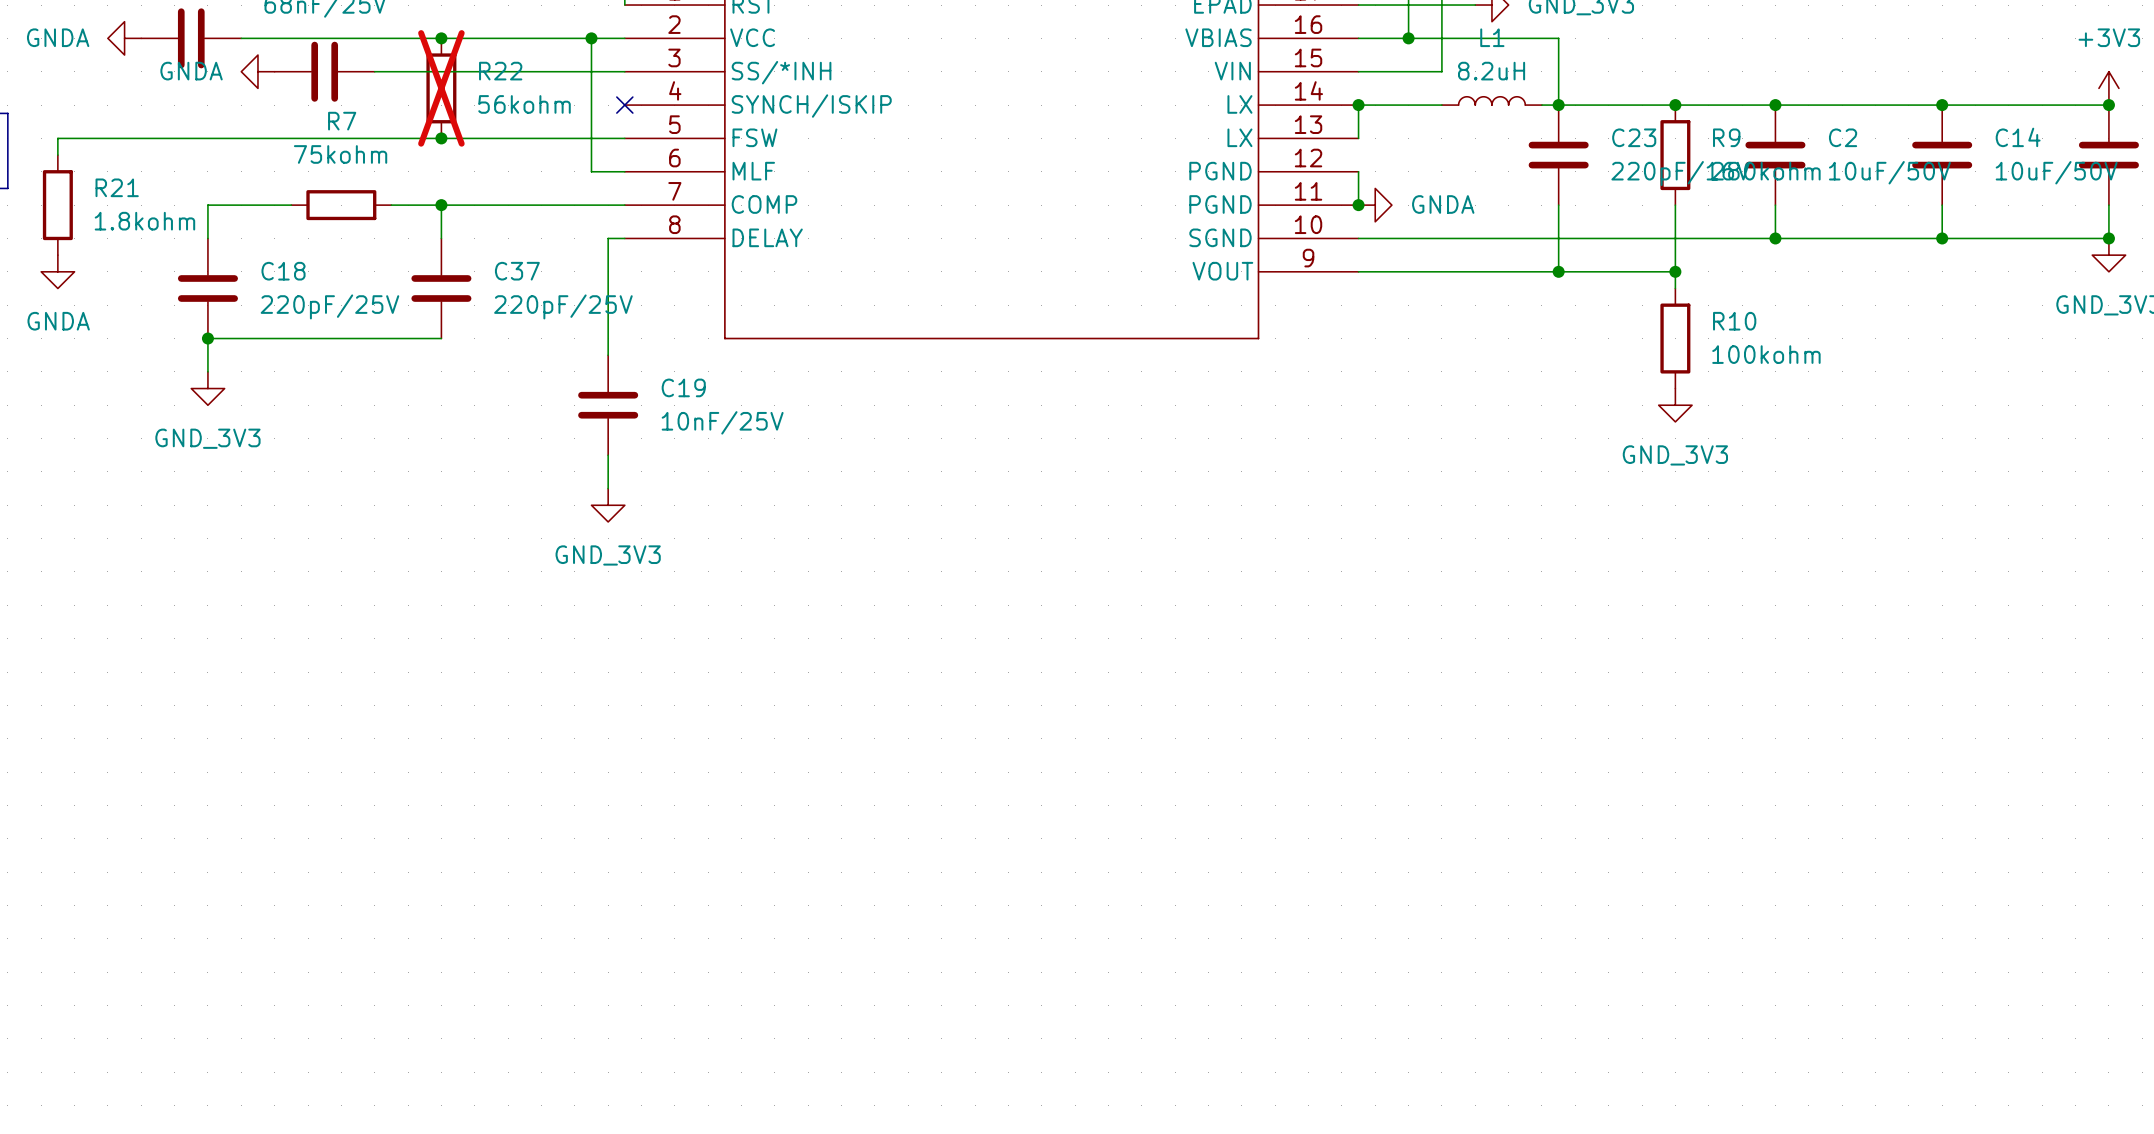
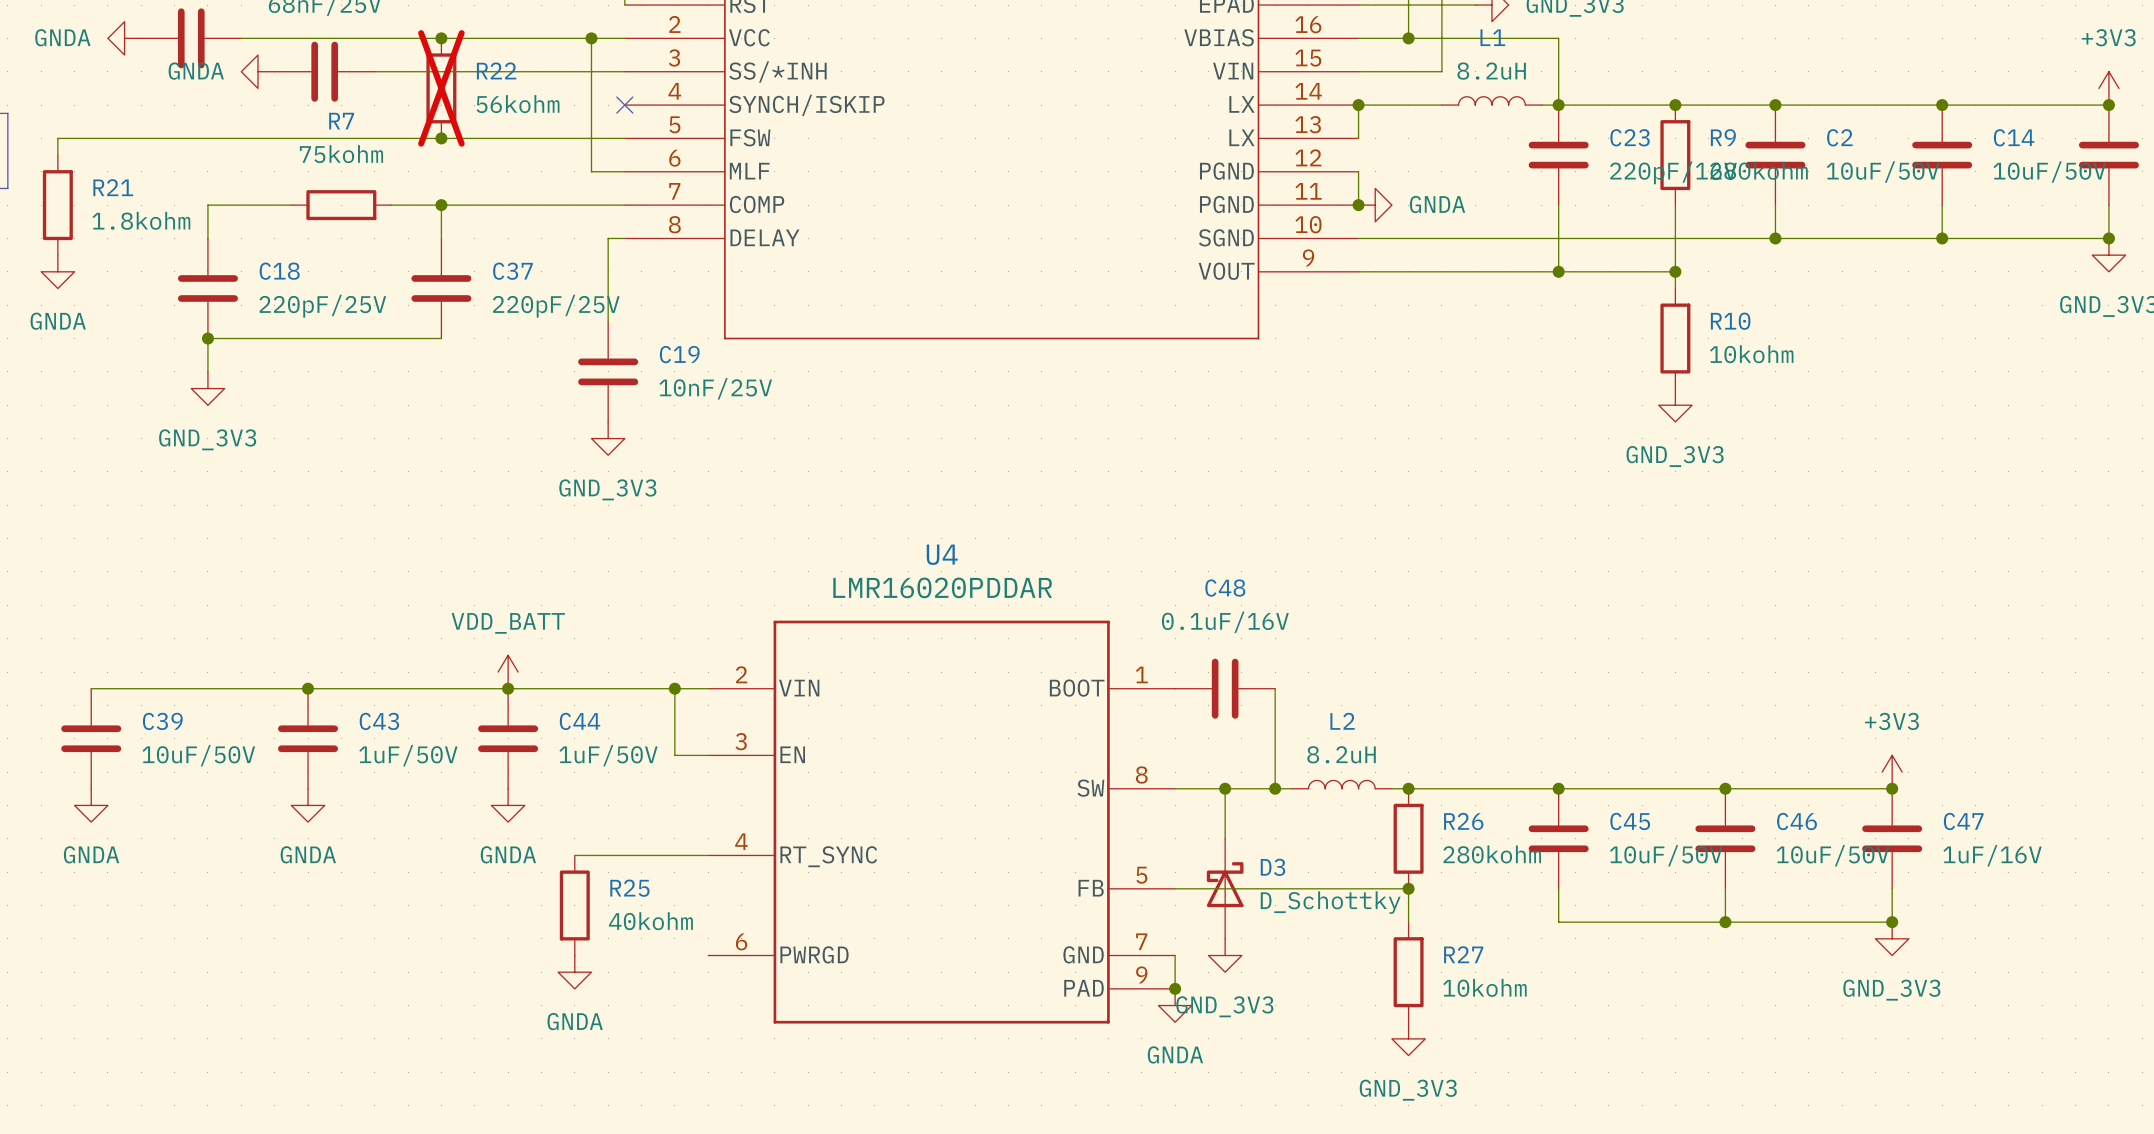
R10 value: 100kohm (1766, 354) -> 10kohm (1751, 354)
C19 position: (608, 405) -> (608, 371)
wire: (608, 455) (608, 488) -> none
power symbol position: GND_3V3 (608, 505) -> GND_3V3 (608, 438)
power symbol: none -> VDD_BATT (508, 672)
wire: none -> (91, 688) (708, 688)
junction: none -> (308, 688)
junction: none -> (508, 688)
wire: none -> (674, 688) (674, 755) (708, 755)
junction: none -> (674, 688)
C48: none -> 0.1uF/16V (1225, 688)
wire: none -> (1275, 688) (1275, 788)
C39: none -> 10uF/50V (91, 738)
C43: none -> 1uF/50V (308, 738)
C44: none -> 1uF/50V (508, 738)
power symbol: none -> +3V3 (1892, 772)
L2: none -> 8.2uH (1341, 784)
wire: none -> (1175, 788) (1291, 788)
wire: none -> (1225, 788) (1225, 838)
junction: none -> (1225, 788)
junction: none -> (1275, 788)
wire: none -> (1391, 788) (1892, 788)
junction: none -> (1408, 788)
junction: none -> (1558, 788)
junction: none -> (1725, 788)
junction: none -> (1892, 788)
power symbol: none -> GNDA (91, 805)
power symbol: none -> GNDA (308, 805)
power symbol: none -> GNDA (508, 805)
U4: none -> LMR16020PDDAR (941, 822)
R26: none -> 280kohm (1408, 838)
C45: none -> 10uF/50V (1558, 838)
C46: none -> 10uF/50V (1725, 838)
C47: none -> 1uF/16V (1892, 838)
wire: none -> (574, 855) (708, 855)
wire: none -> (1175, 888) (1408, 888) (1408, 922)
D3: none -> D_Schottky (1225, 888)
junction: none -> (1408, 888)
wire: none -> (1558, 888) (1558, 922) (1892, 922) (1892, 888)
wire: none -> (1725, 888) (1725, 922)
R25: none -> 40kohm (574, 905)
junction: none -> (1725, 922)
junction: none -> (1892, 922)
power symbol: none -> GND_3V3 (1892, 938)
wire: none -> (1175, 955) (1175, 988)
power symbol: none -> GND_3V3 (1225, 955)
power symbol: none -> GNDA (574, 972)
R27: none -> 10kohm (1408, 972)
junction: none -> (1175, 988)
power symbol: none -> GNDA (1175, 1005)
power symbol: none -> GND_3V3 (1408, 1038)

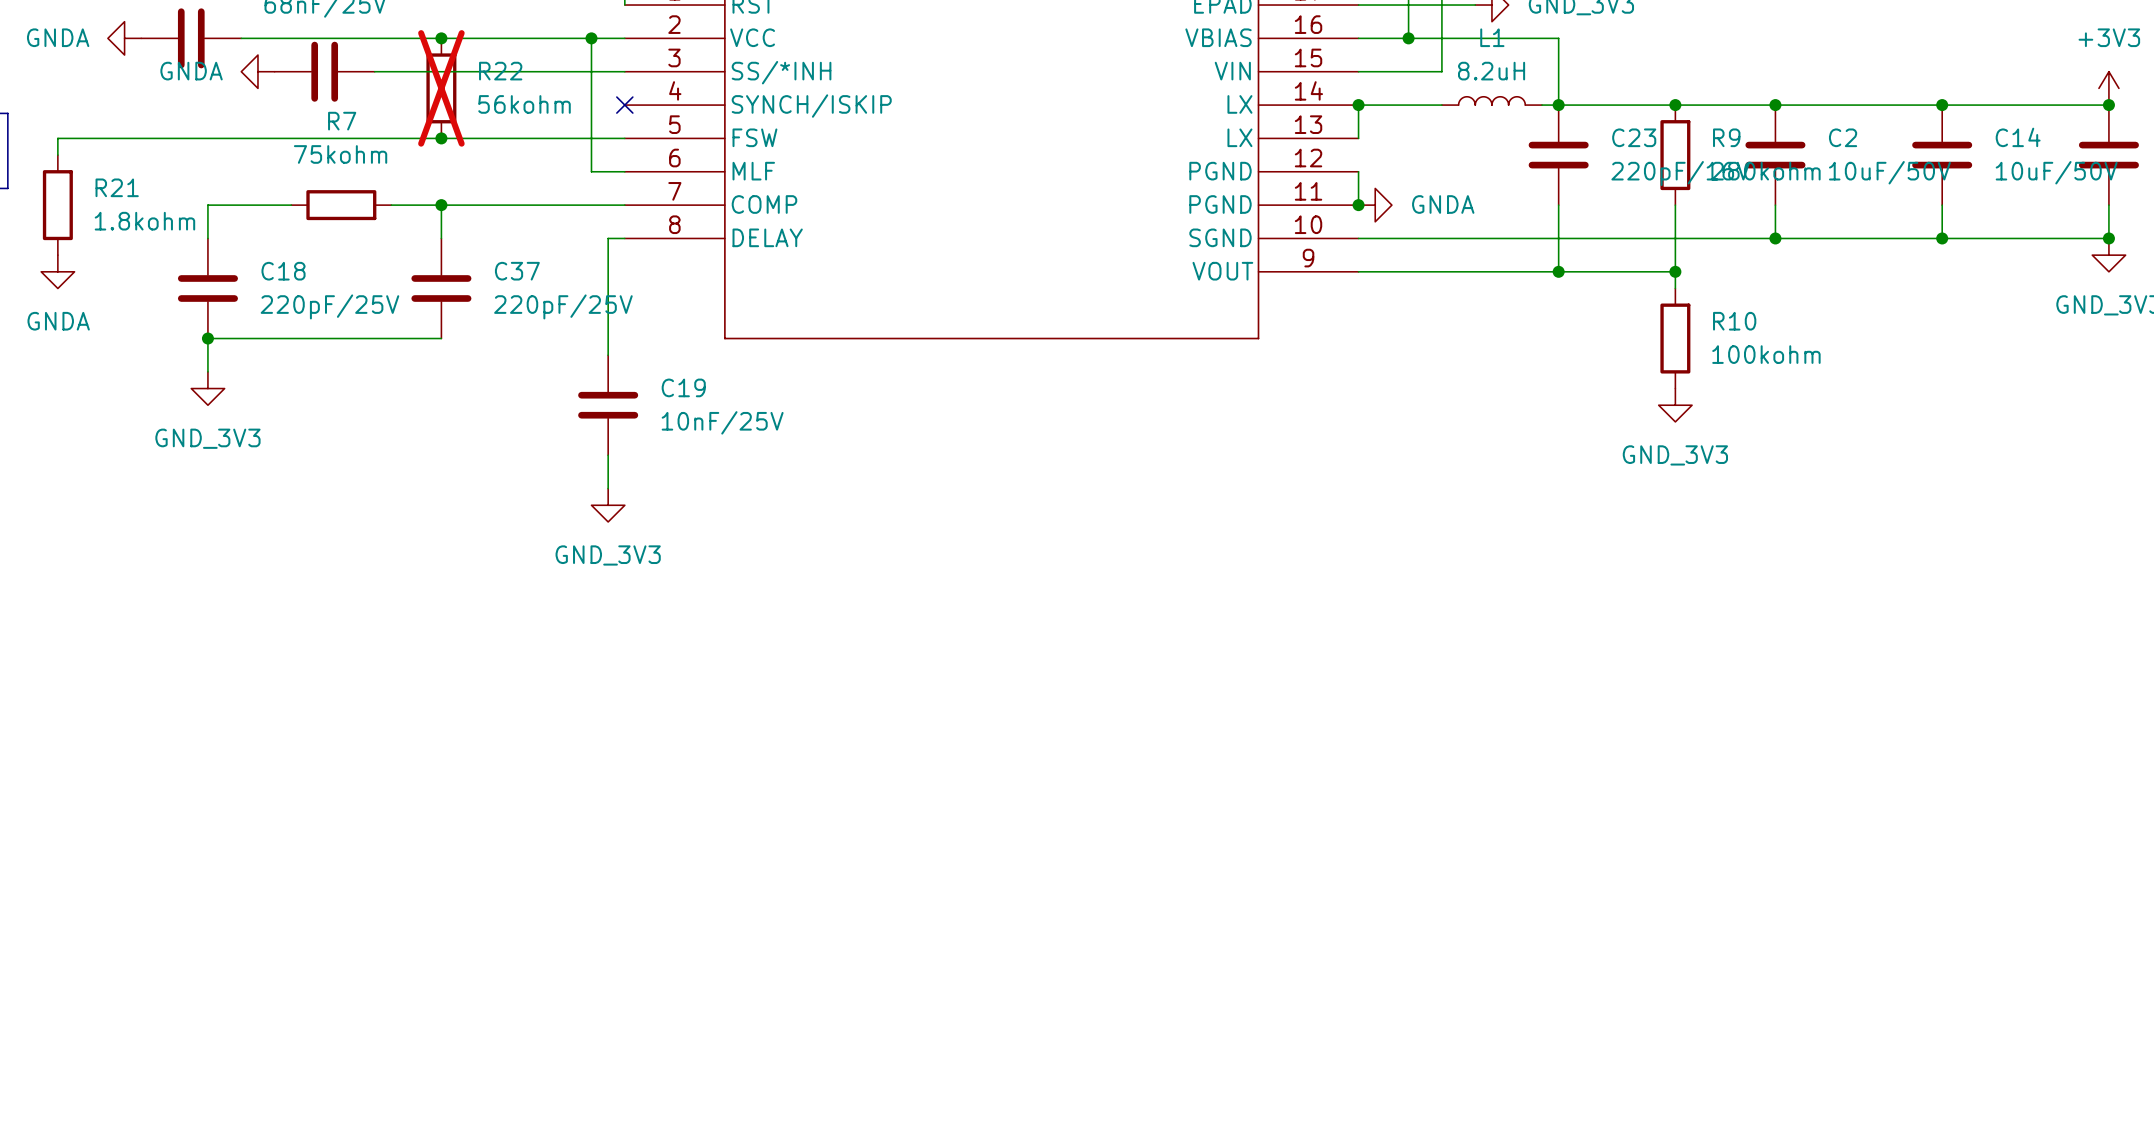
R10 value: 10kohm (1751, 354) -> 100kohm (1766, 354)
C19 position: (608, 371) -> (608, 405)
power symbol position: GND_3V3 (608, 438) -> GND_3V3 (608, 505)
wire: none -> (608, 455) (608, 488)
power symbol: VDD_BATT (508, 672) -> none
wire: (91, 688) (708, 688) -> none
junction: (308, 688) -> none
junction: (508, 688) -> none
wire: (674, 688) (674, 755) (708, 755) -> none
junction: (674, 688) -> none
C48: 0.1uF/16V (1225, 688) -> none
wire: (1275, 688) (1275, 788) -> none
C39: 10uF/50V (91, 738) -> none
C43: 1uF/50V (308, 738) -> none
C44: 1uF/50V (508, 738) -> none
power symbol: +3V3 (1892, 772) -> none
L2: 8.2uH (1341, 784) -> none
wire: (1175, 788) (1291, 788) -> none
wire: (1225, 788) (1225, 838) -> none
junction: (1225, 788) -> none
junction: (1275, 788) -> none
wire: (1391, 788) (1892, 788) -> none
junction: (1408, 788) -> none
junction: (1558, 788) -> none
junction: (1725, 788) -> none
junction: (1892, 788) -> none
power symbol: GNDA (91, 805) -> none
power symbol: GNDA (308, 805) -> none
power symbol: GNDA (508, 805) -> none
U4: LMR16020PDDAR (941, 822) -> none
R26: 280kohm (1408, 838) -> none
C45: 10uF/50V (1558, 838) -> none
C46: 10uF/50V (1725, 838) -> none
C47: 1uF/16V (1892, 838) -> none
wire: (574, 855) (708, 855) -> none
wire: (1175, 888) (1408, 888) (1408, 922) -> none
D3: D_Schottky (1225, 888) -> none
junction: (1408, 888) -> none
wire: (1558, 888) (1558, 922) (1892, 922) (1892, 888) -> none
wire: (1725, 888) (1725, 922) -> none
R25: 40kohm (574, 905) -> none
junction: (1725, 922) -> none
junction: (1892, 922) -> none
power symbol: GND_3V3 (1892, 938) -> none
wire: (1175, 955) (1175, 988) -> none
power symbol: GND_3V3 (1225, 955) -> none
power symbol: GNDA (574, 972) -> none
R27: 10kohm (1408, 972) -> none
junction: (1175, 988) -> none
power symbol: GNDA (1175, 1005) -> none
power symbol: GND_3V3 (1408, 1038) -> none

